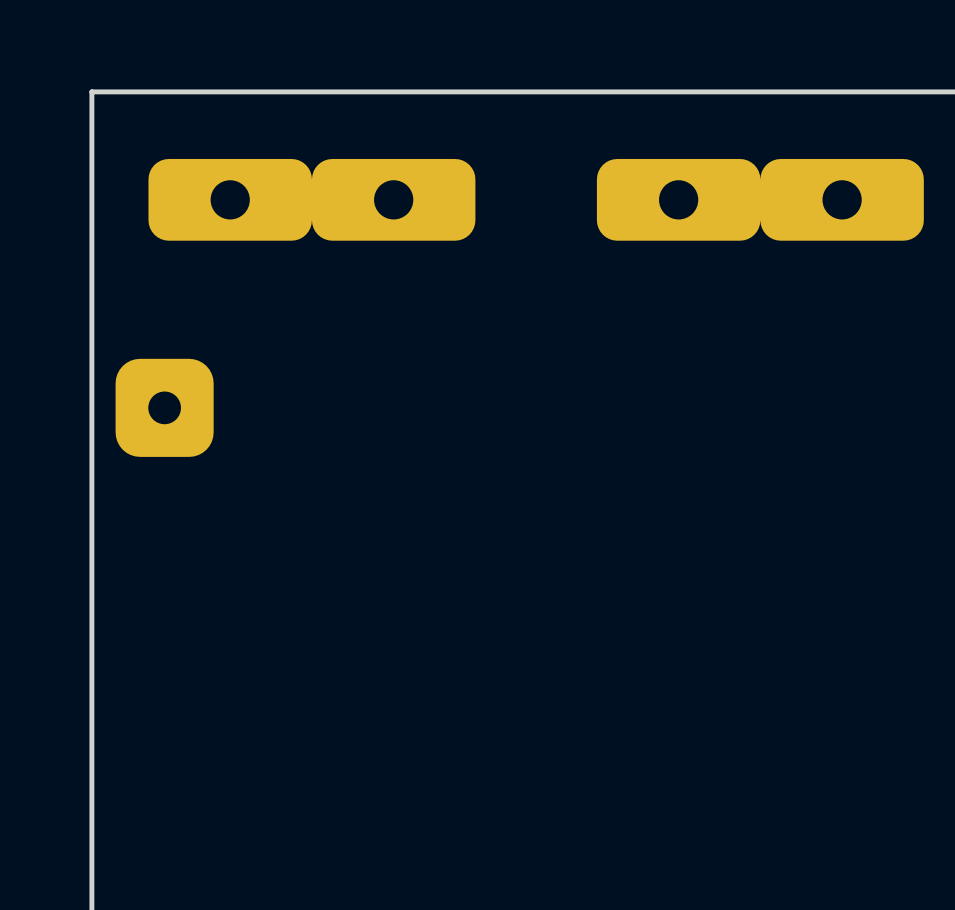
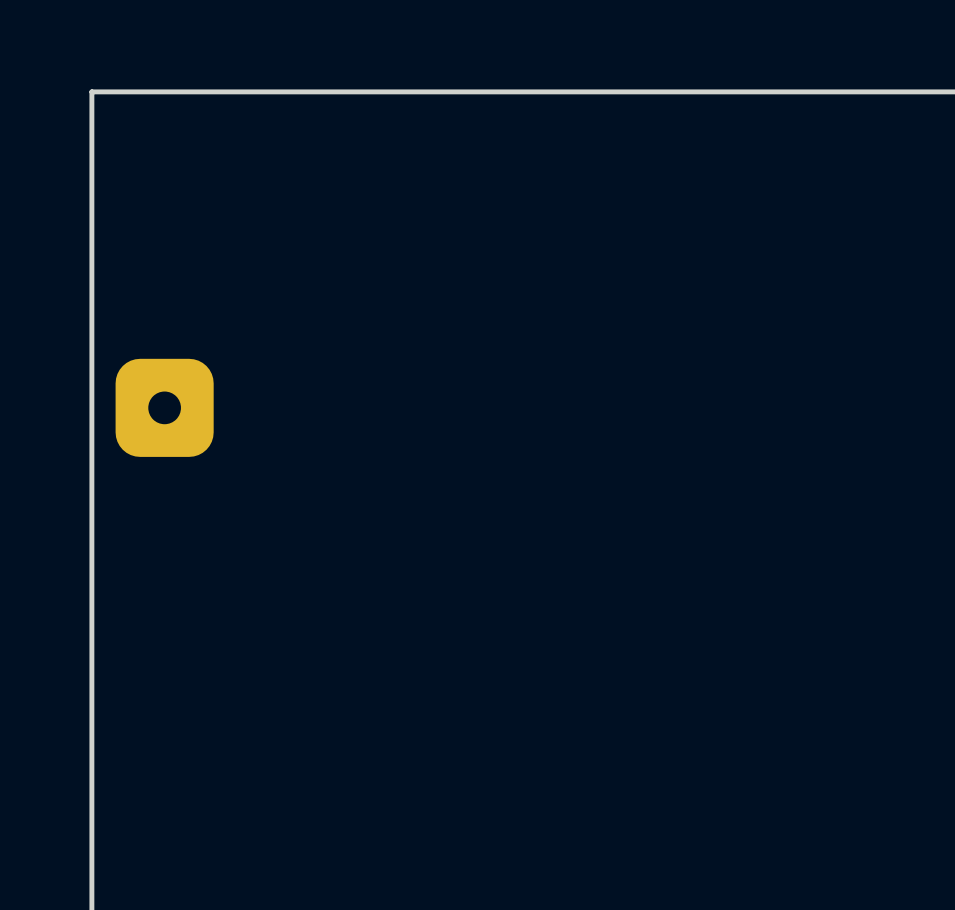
part: (311, 199) -> none
part: (760, 199) -> none

